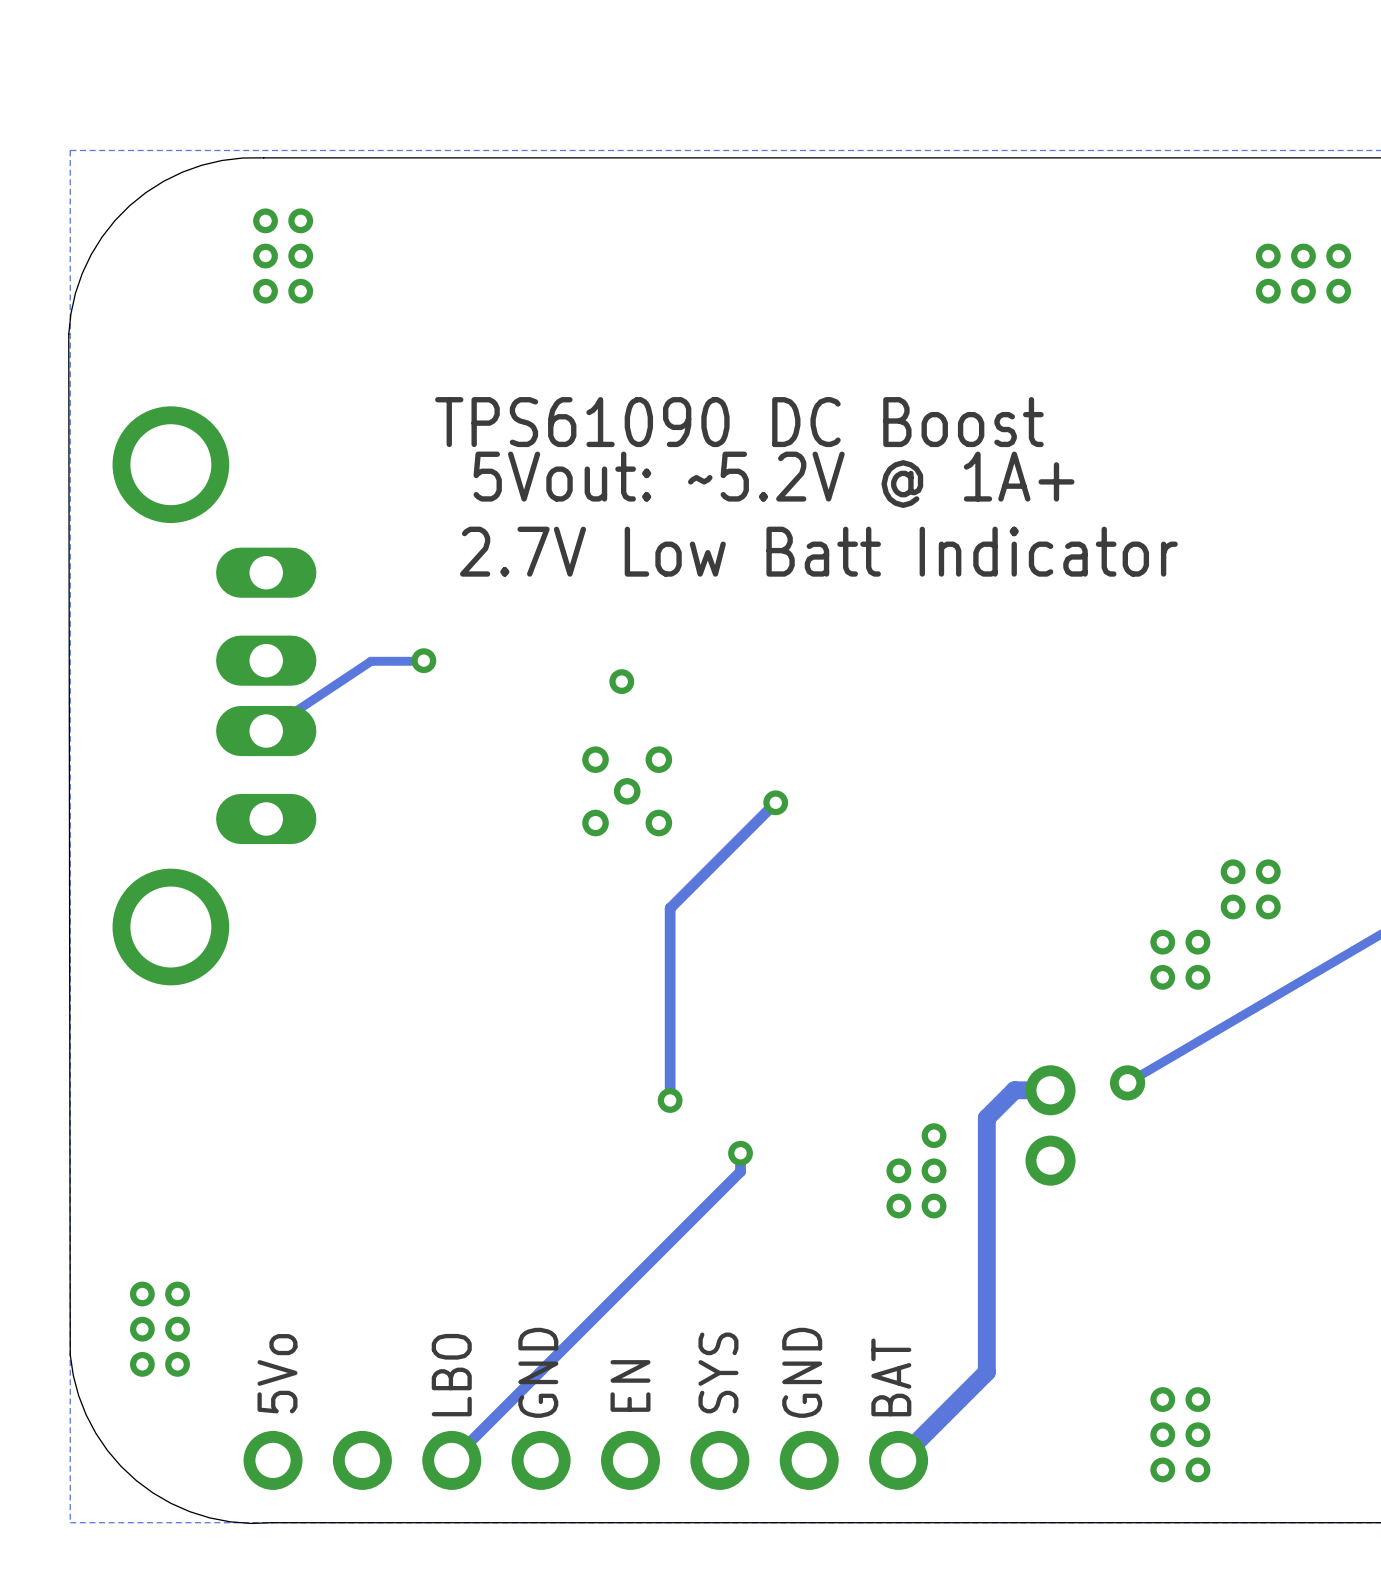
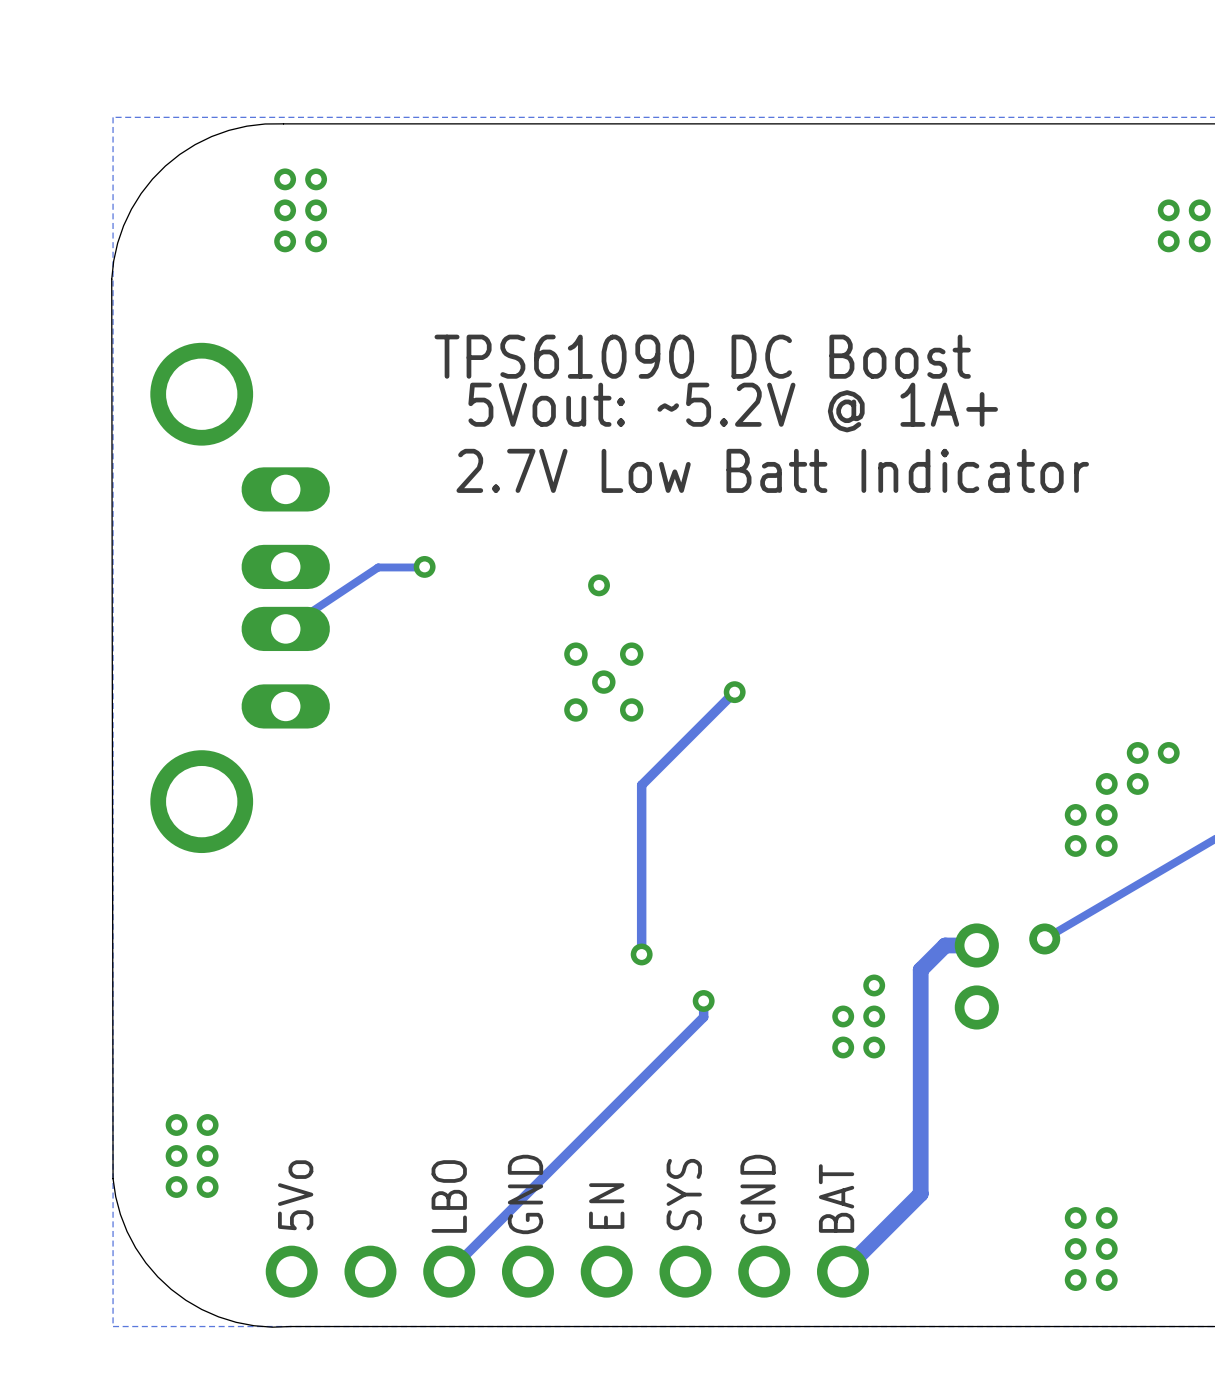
via position: (1268, 906) -> (1106, 783)

